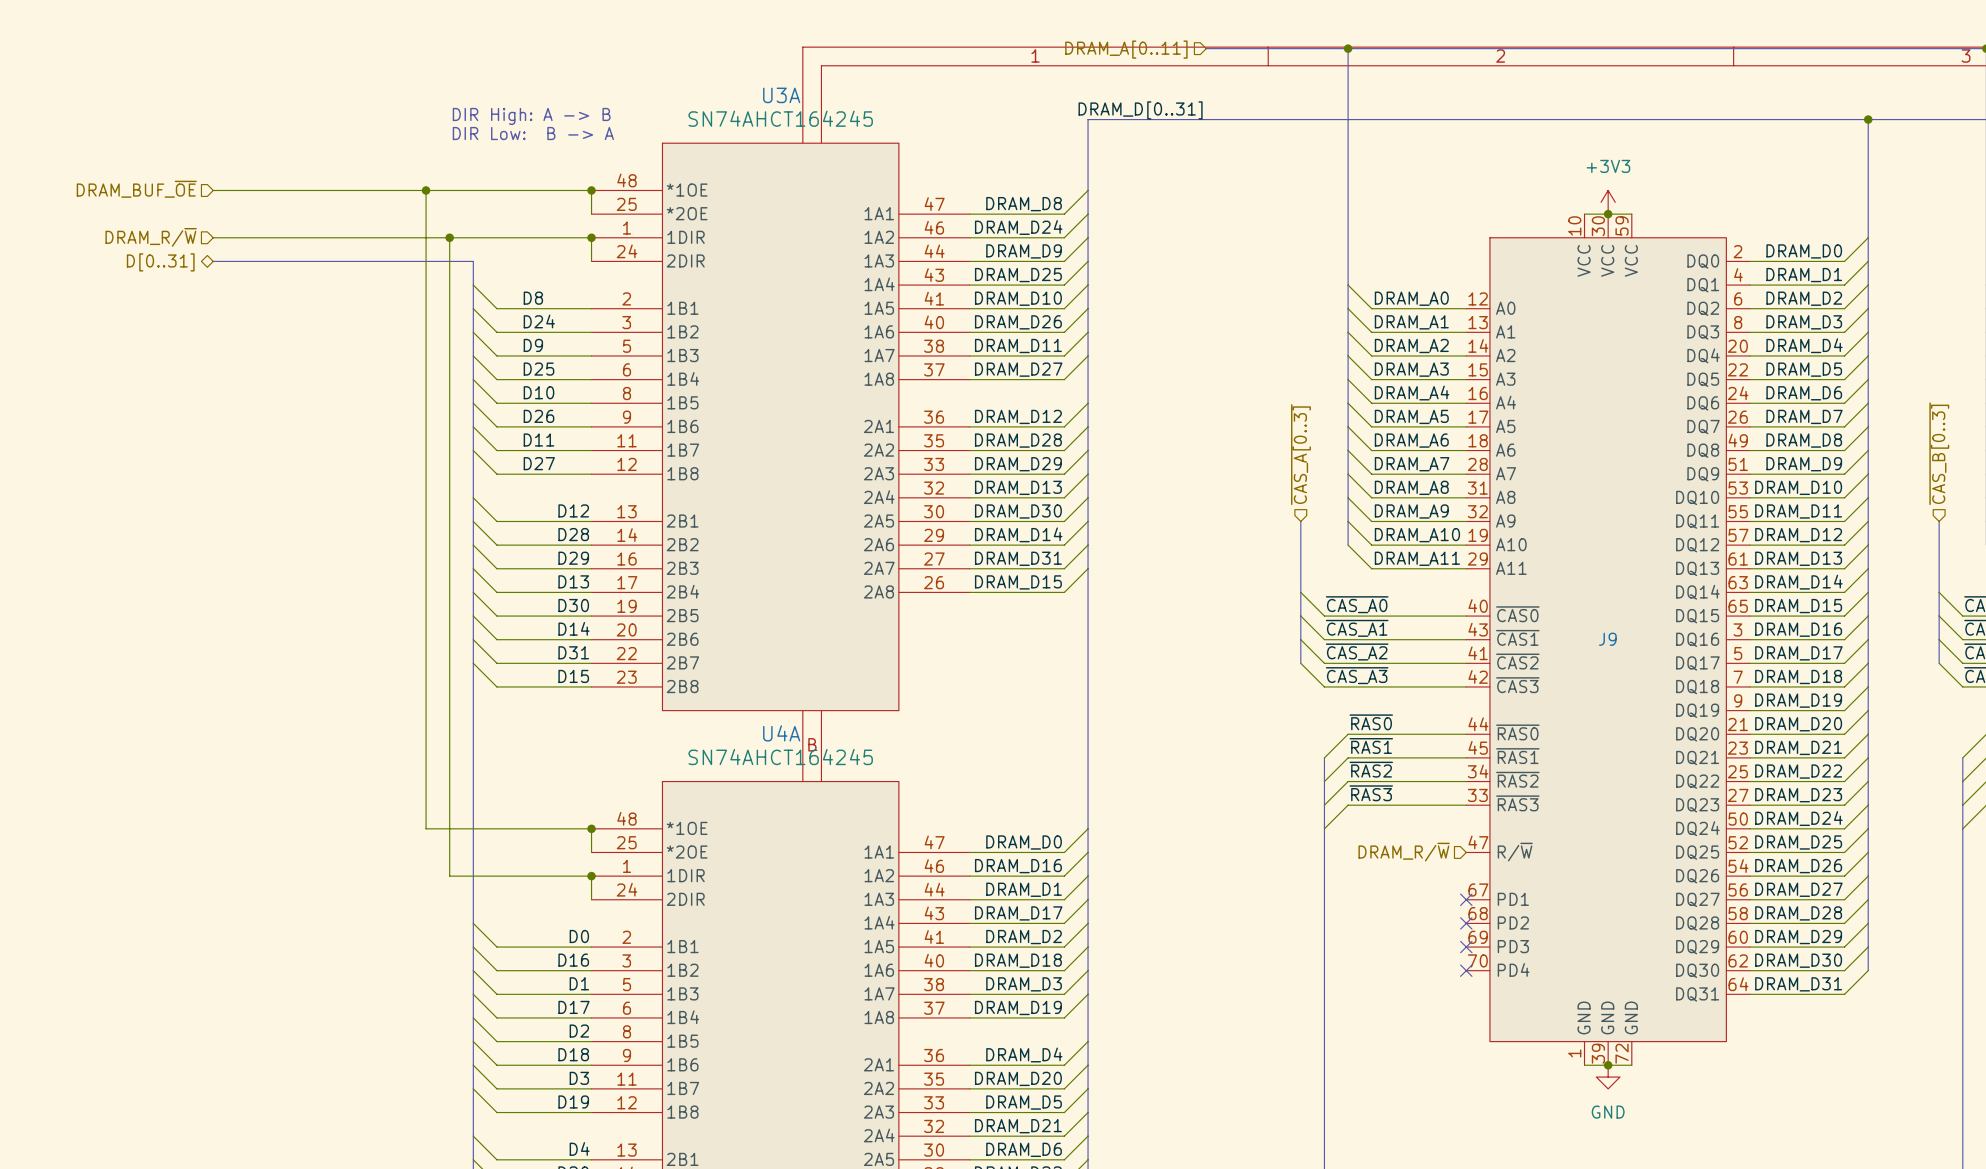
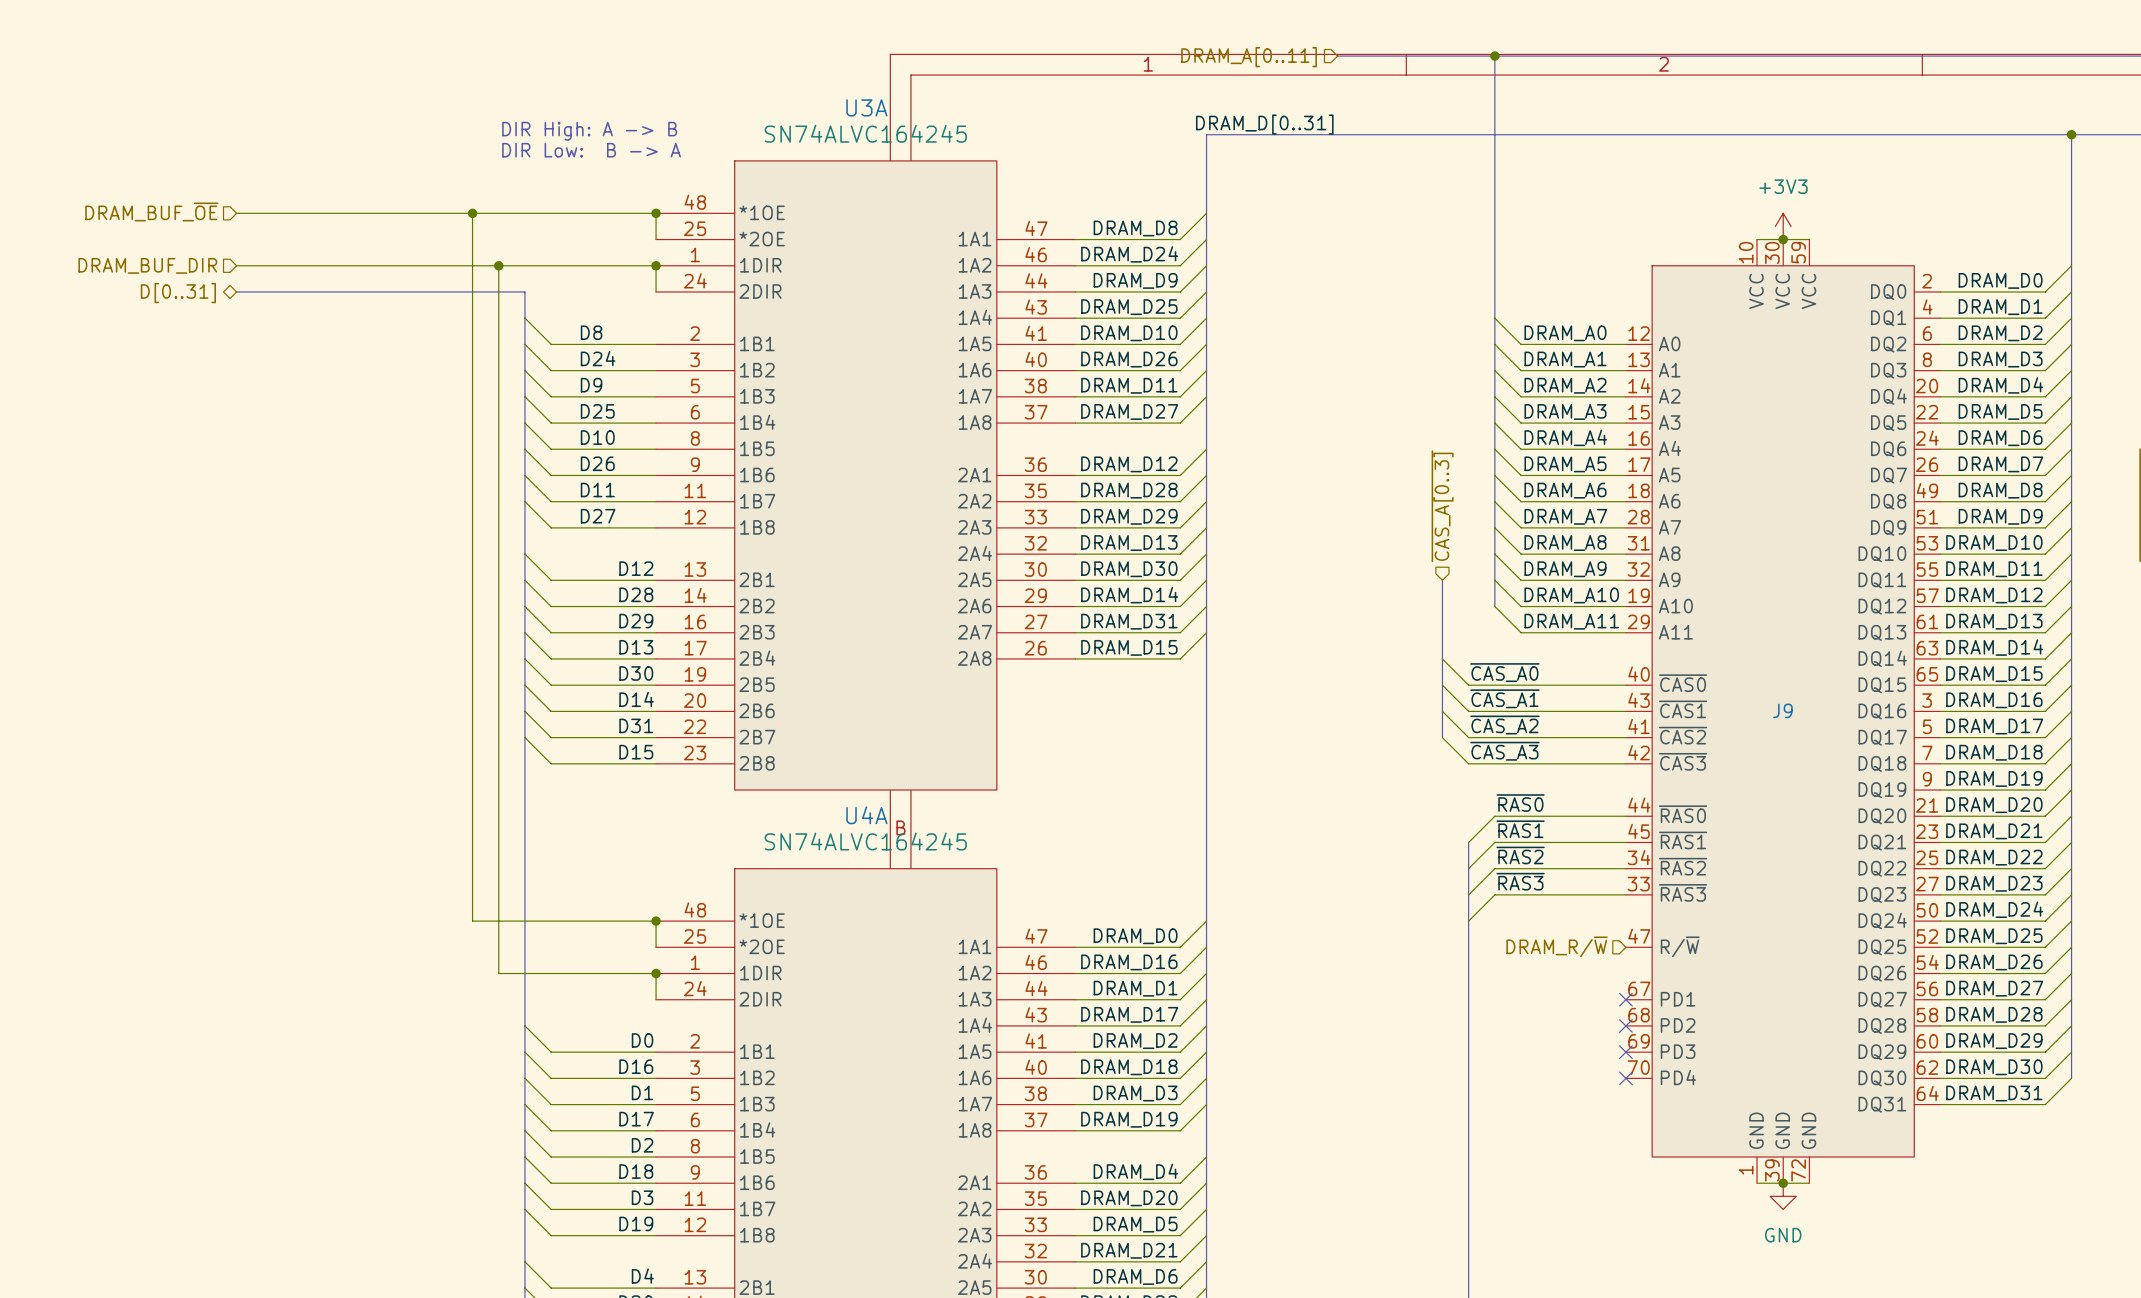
U3A value: SN74AHCT164245 (780, 118) -> SN74ALVC164245 (865, 133)
hierarchical label: DRAM_R/~{W} (151, 237) -> DRAM_BUF_DIR (147, 265)
U4A value: SN74AHCT164245 (780, 757) -> SN74ALVC164245 (865, 841)

